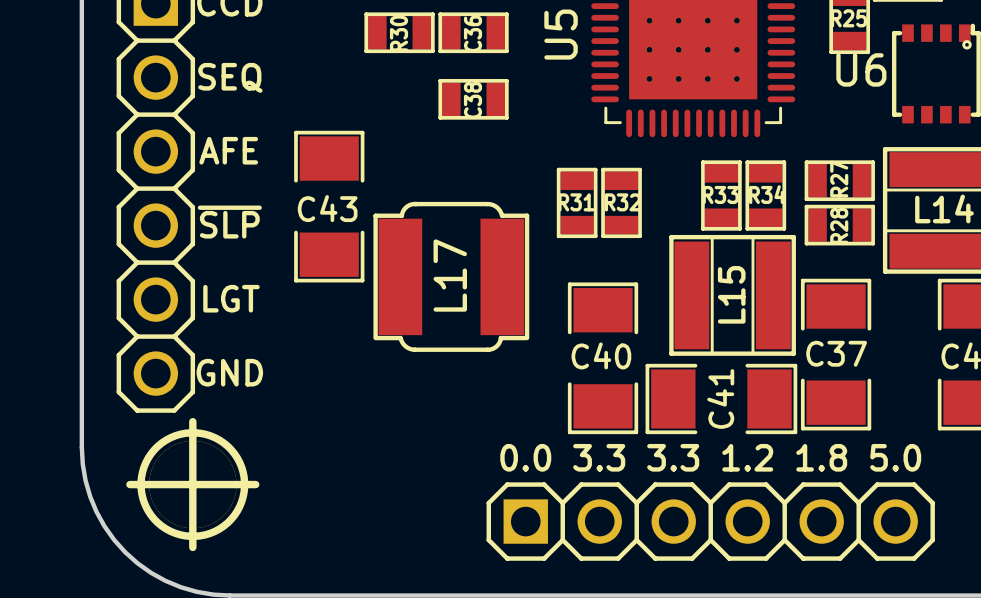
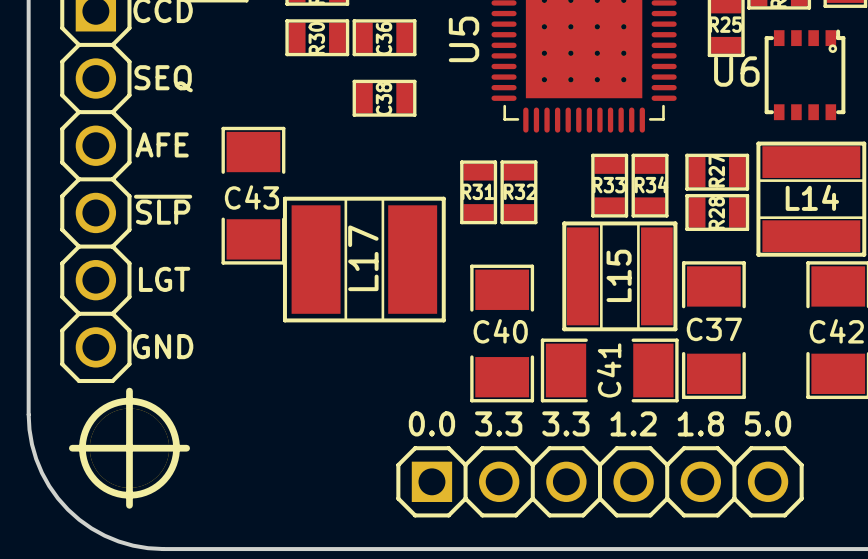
L17 footprint: [373, 201, 530, 352] -> [282, 196, 446, 323]

